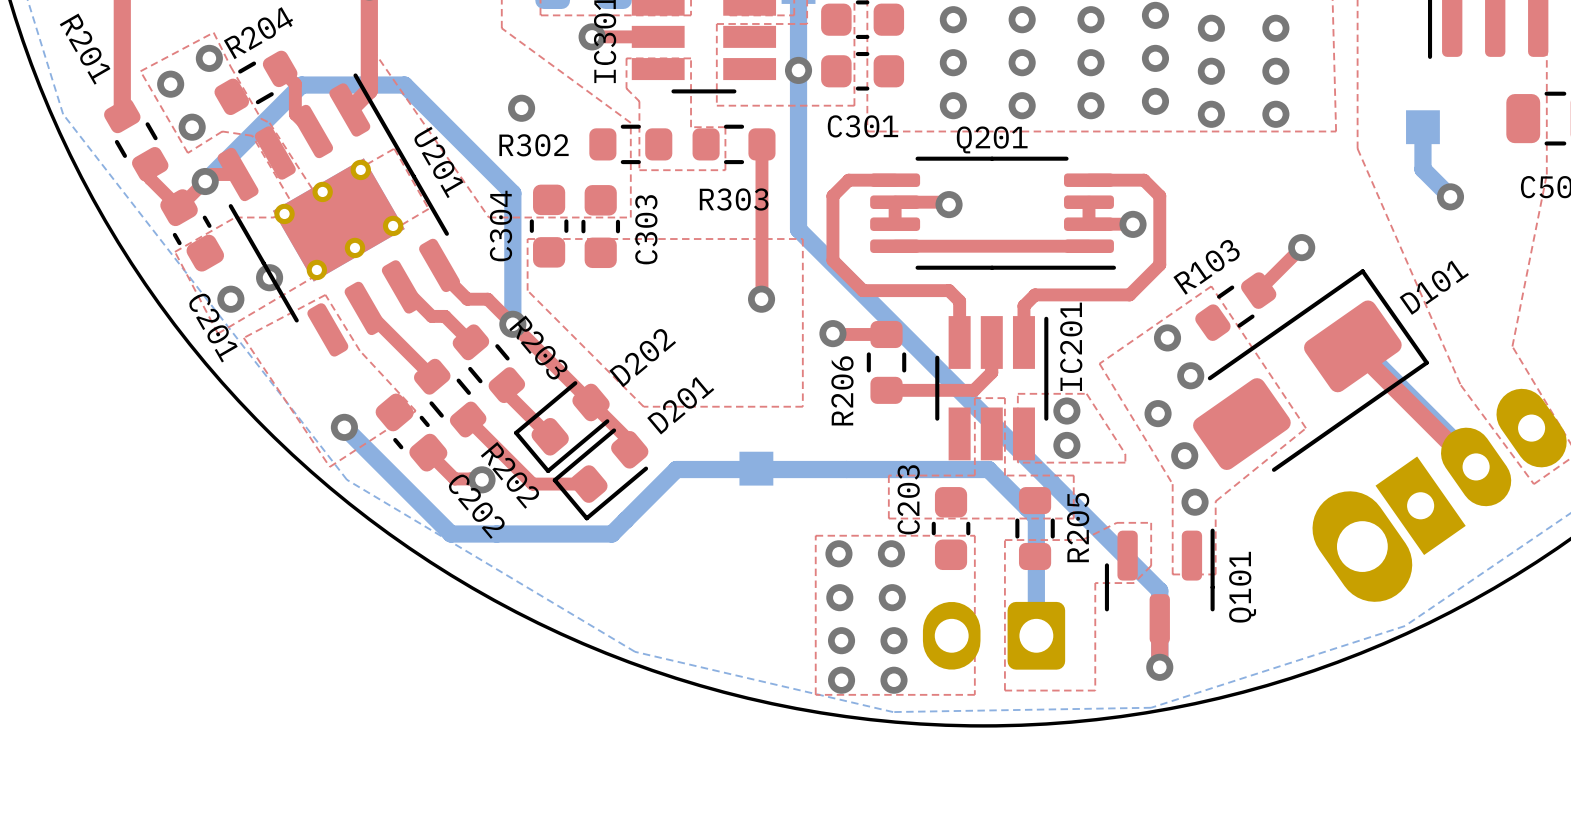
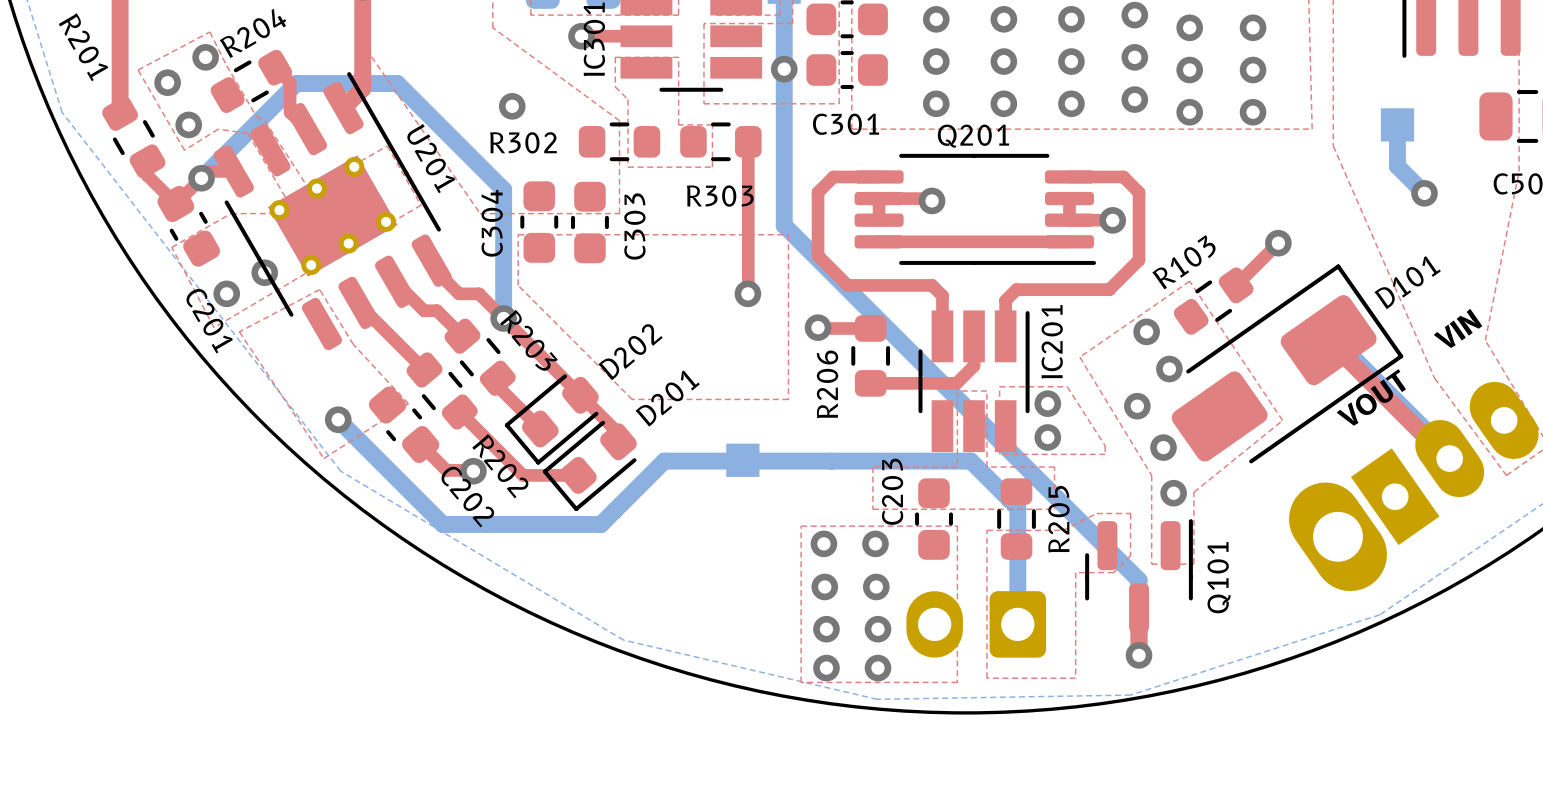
text: none -> VIN (1458, 328)
text: none -> VOUT (1371, 397)

